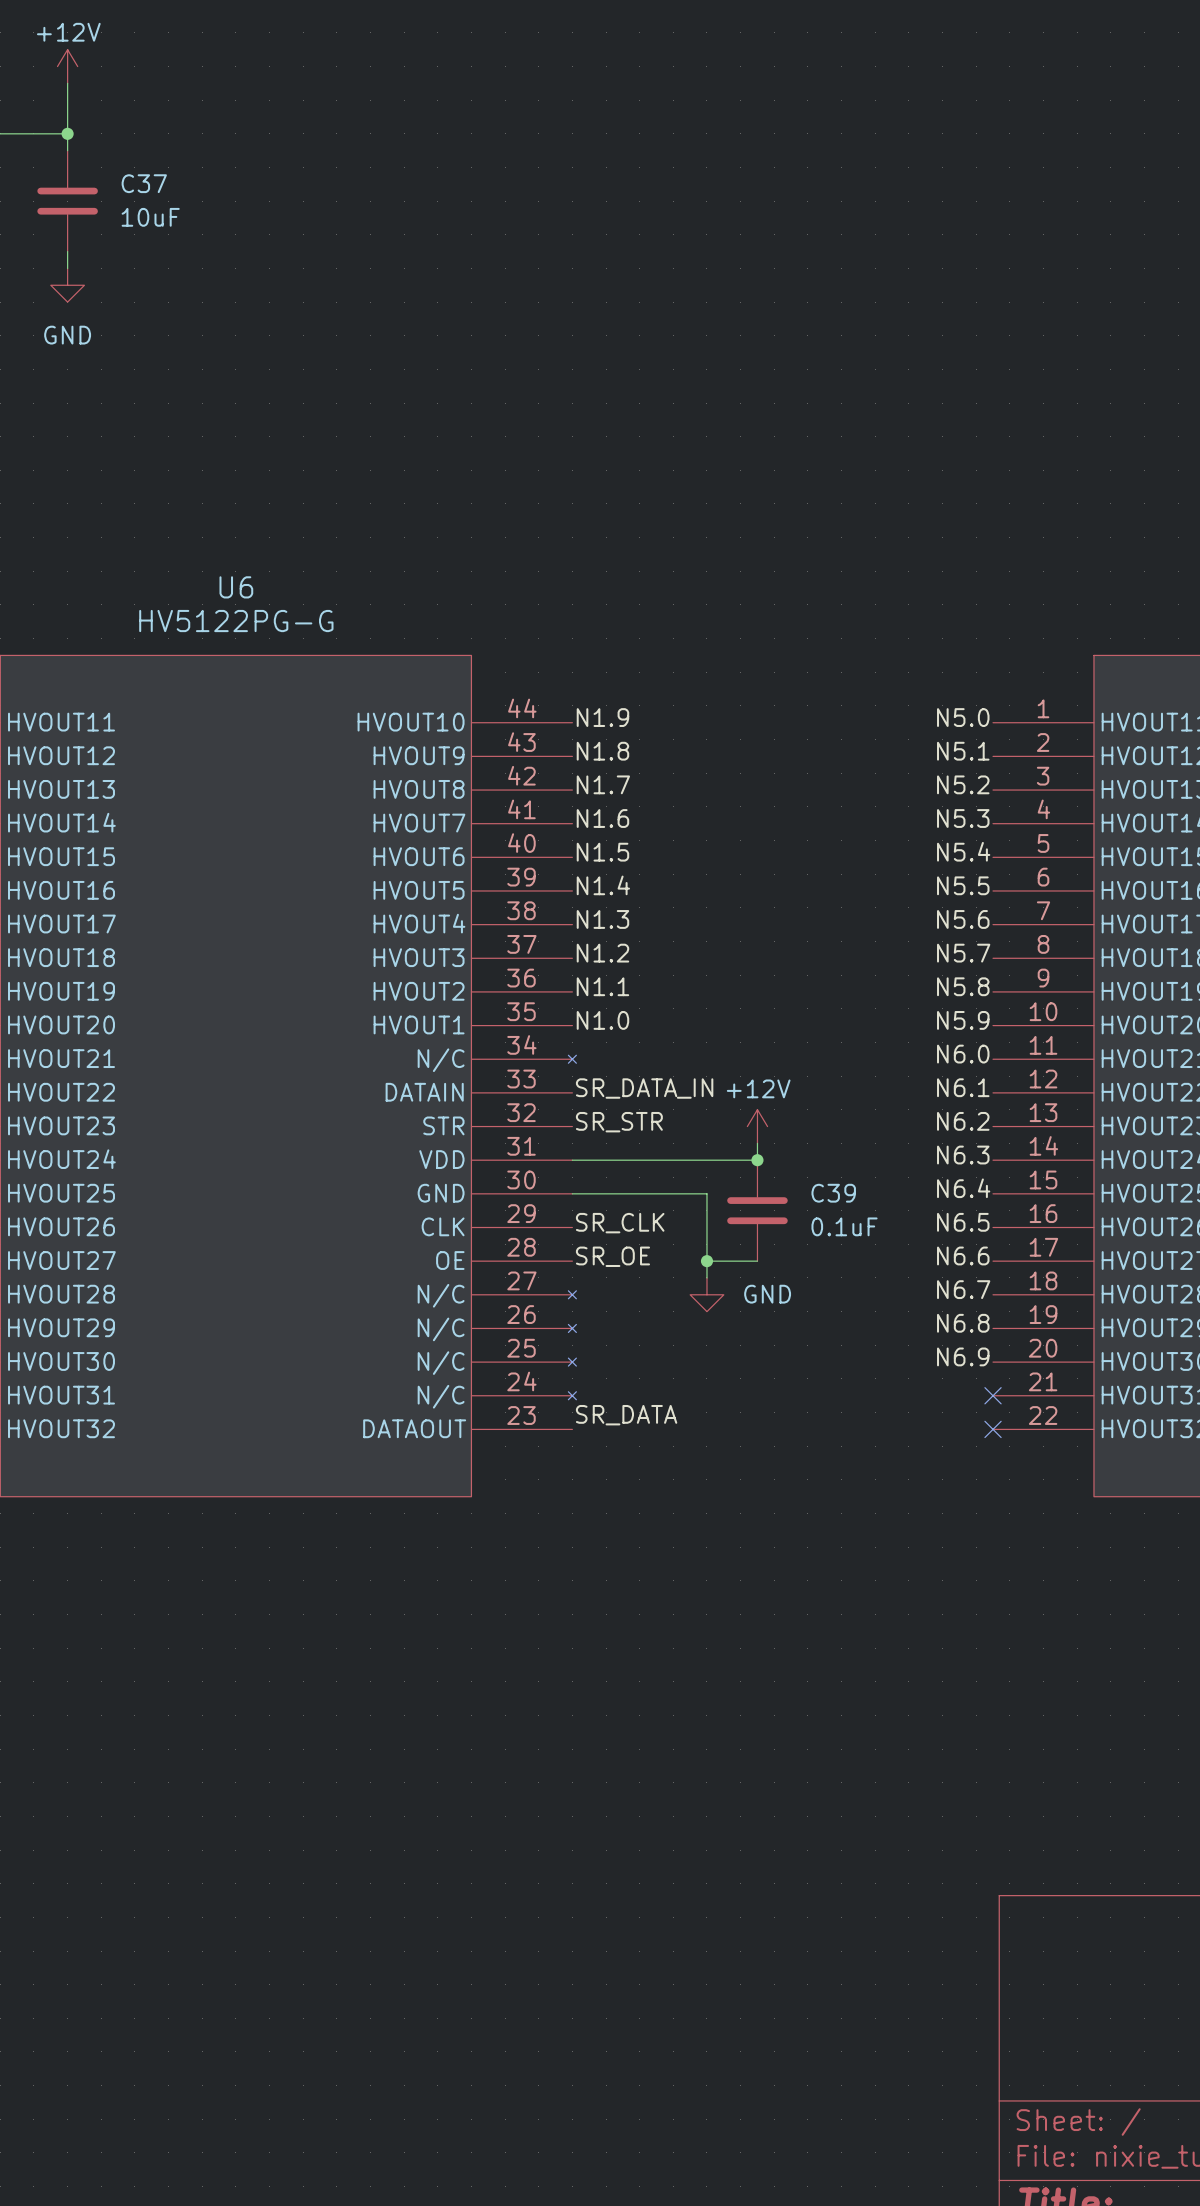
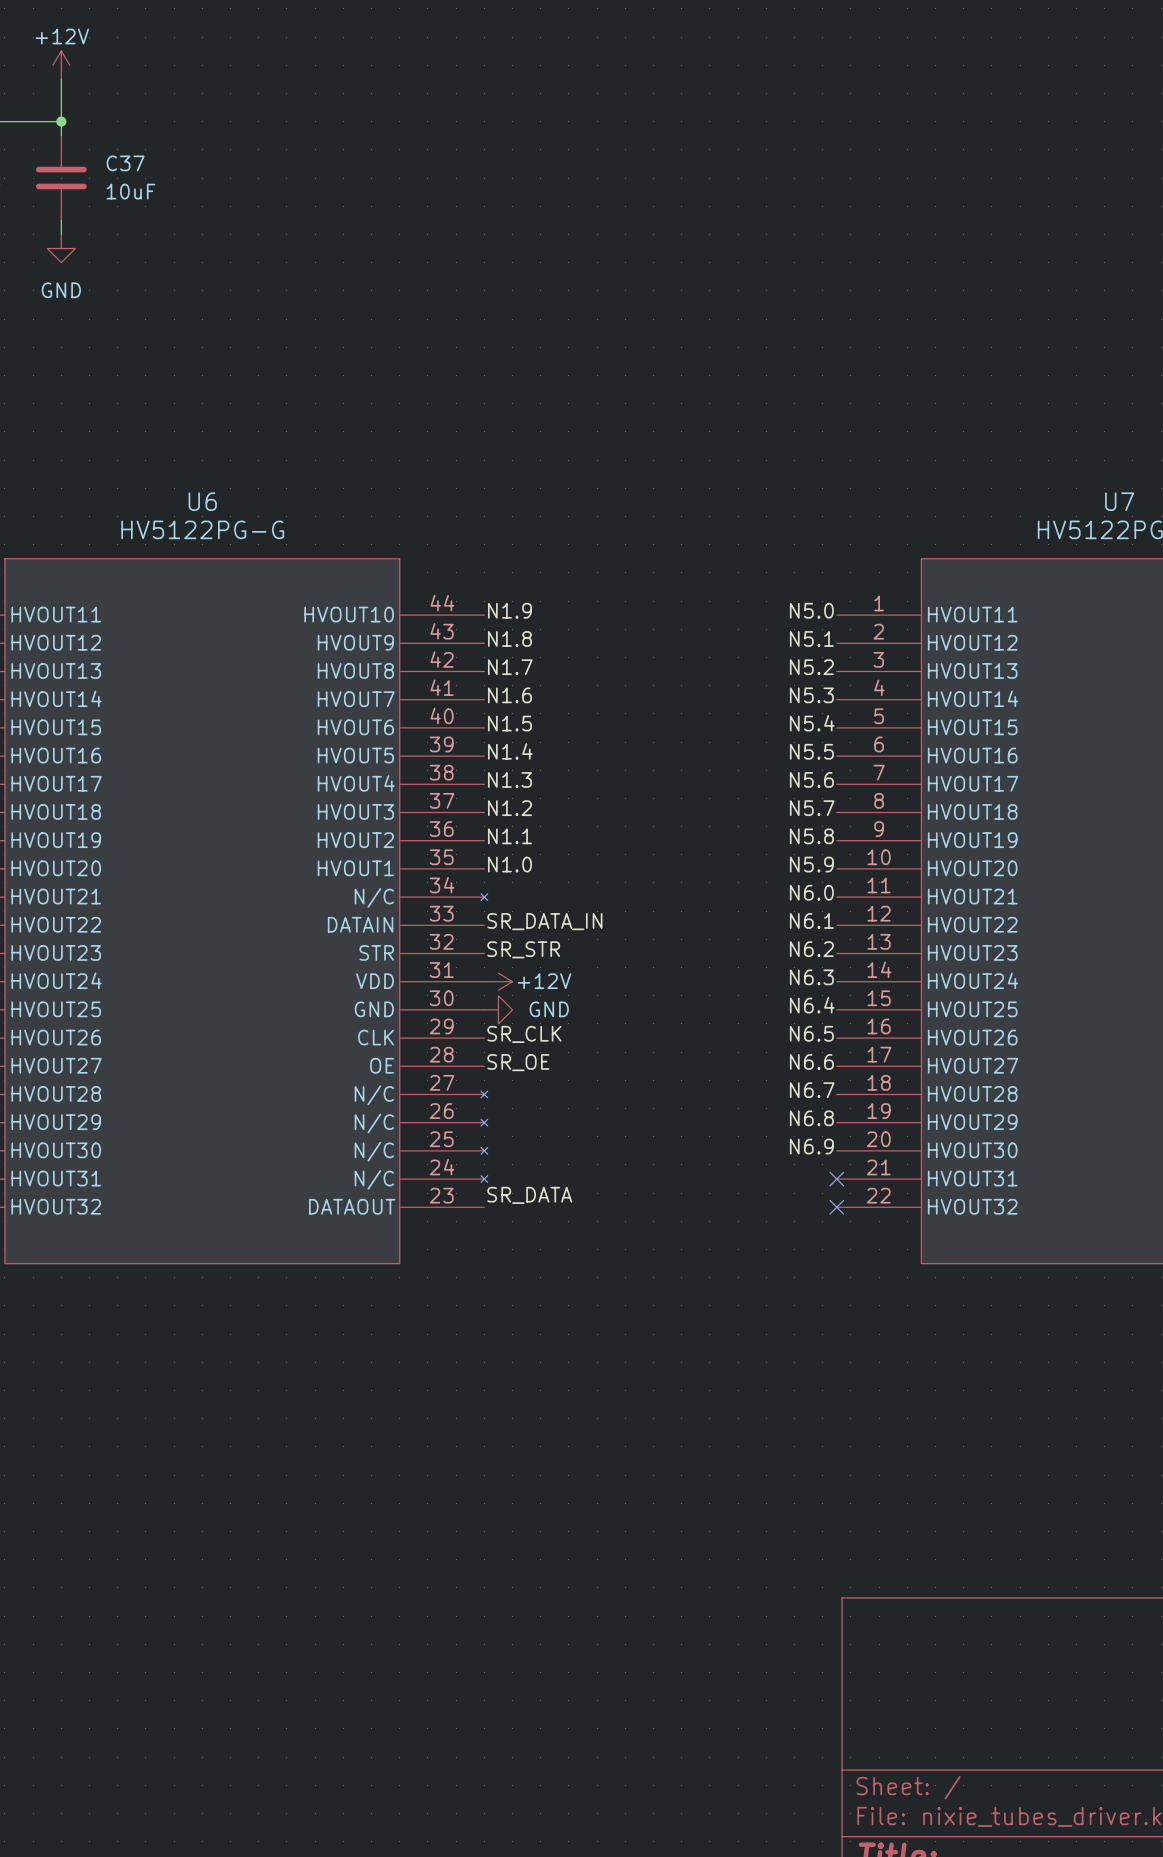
power symbol rotation: 0° (757, 1126) -> 90° clockwise (498, 981)
power symbol position: +12V (757, 1126) -> +12V (498, 981)
wire: (757, 1143) (757, 1160) (572, 1160) -> none
junction: (757, 1160) -> none
wire: (572, 1193) (706, 1193) (706, 1277) -> none
C39: 0.1uF (757, 1210) -> none
wire: (706, 1261) (757, 1261) -> none
junction: (706, 1261) -> none
power symbol rotation: 0° (706, 1294) -> 90° counterclockwise (498, 1009)
power symbol position: GND (706, 1294) -> GND (498, 1009)

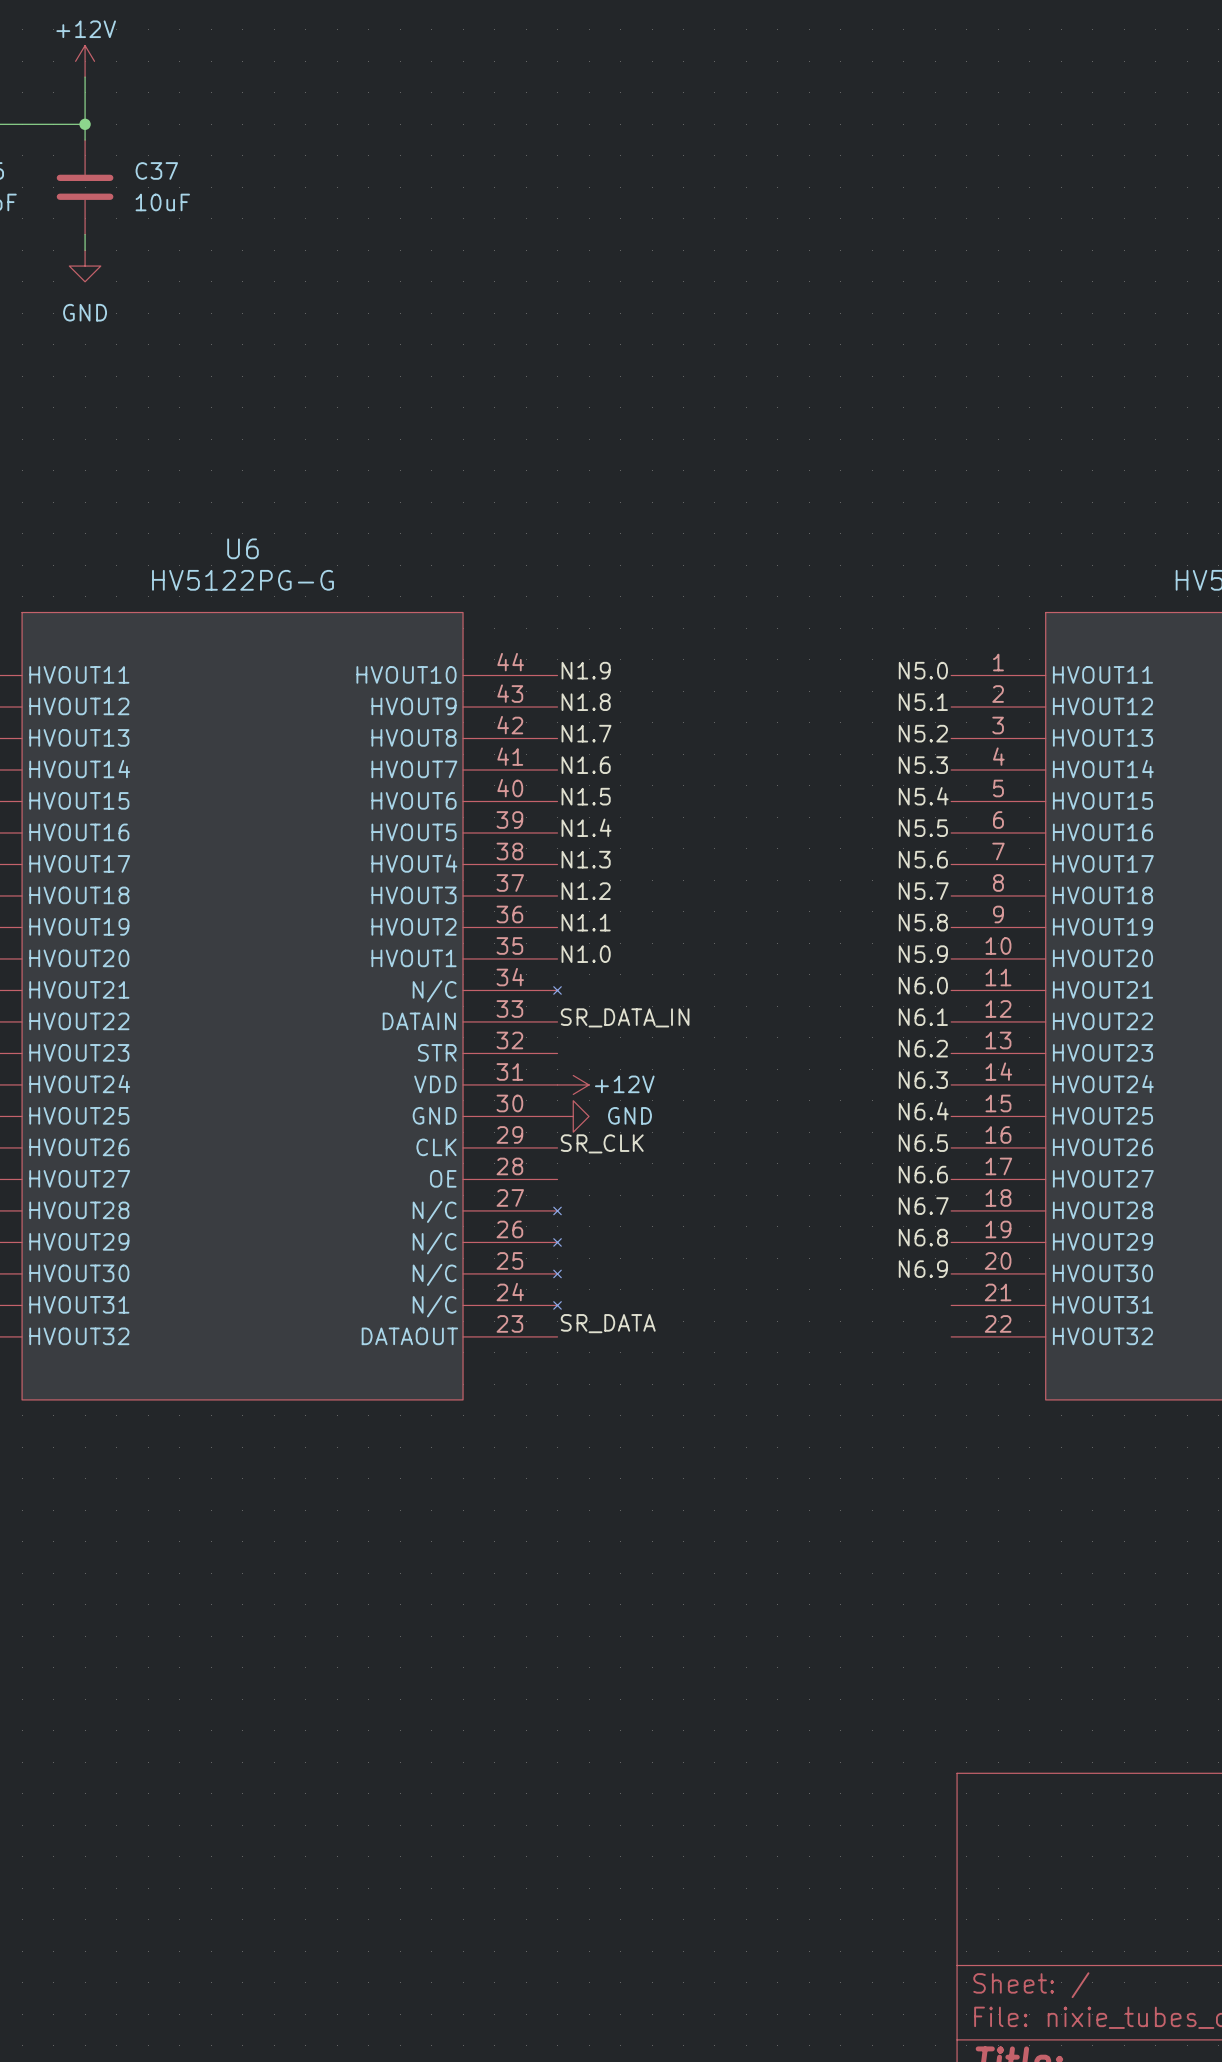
label: SR_STR (523, 949) -> none
label: SR_OE (518, 1062) -> none
no-connect mark: (836, 1179) -> none
no-connect mark: (836, 1207) -> none

